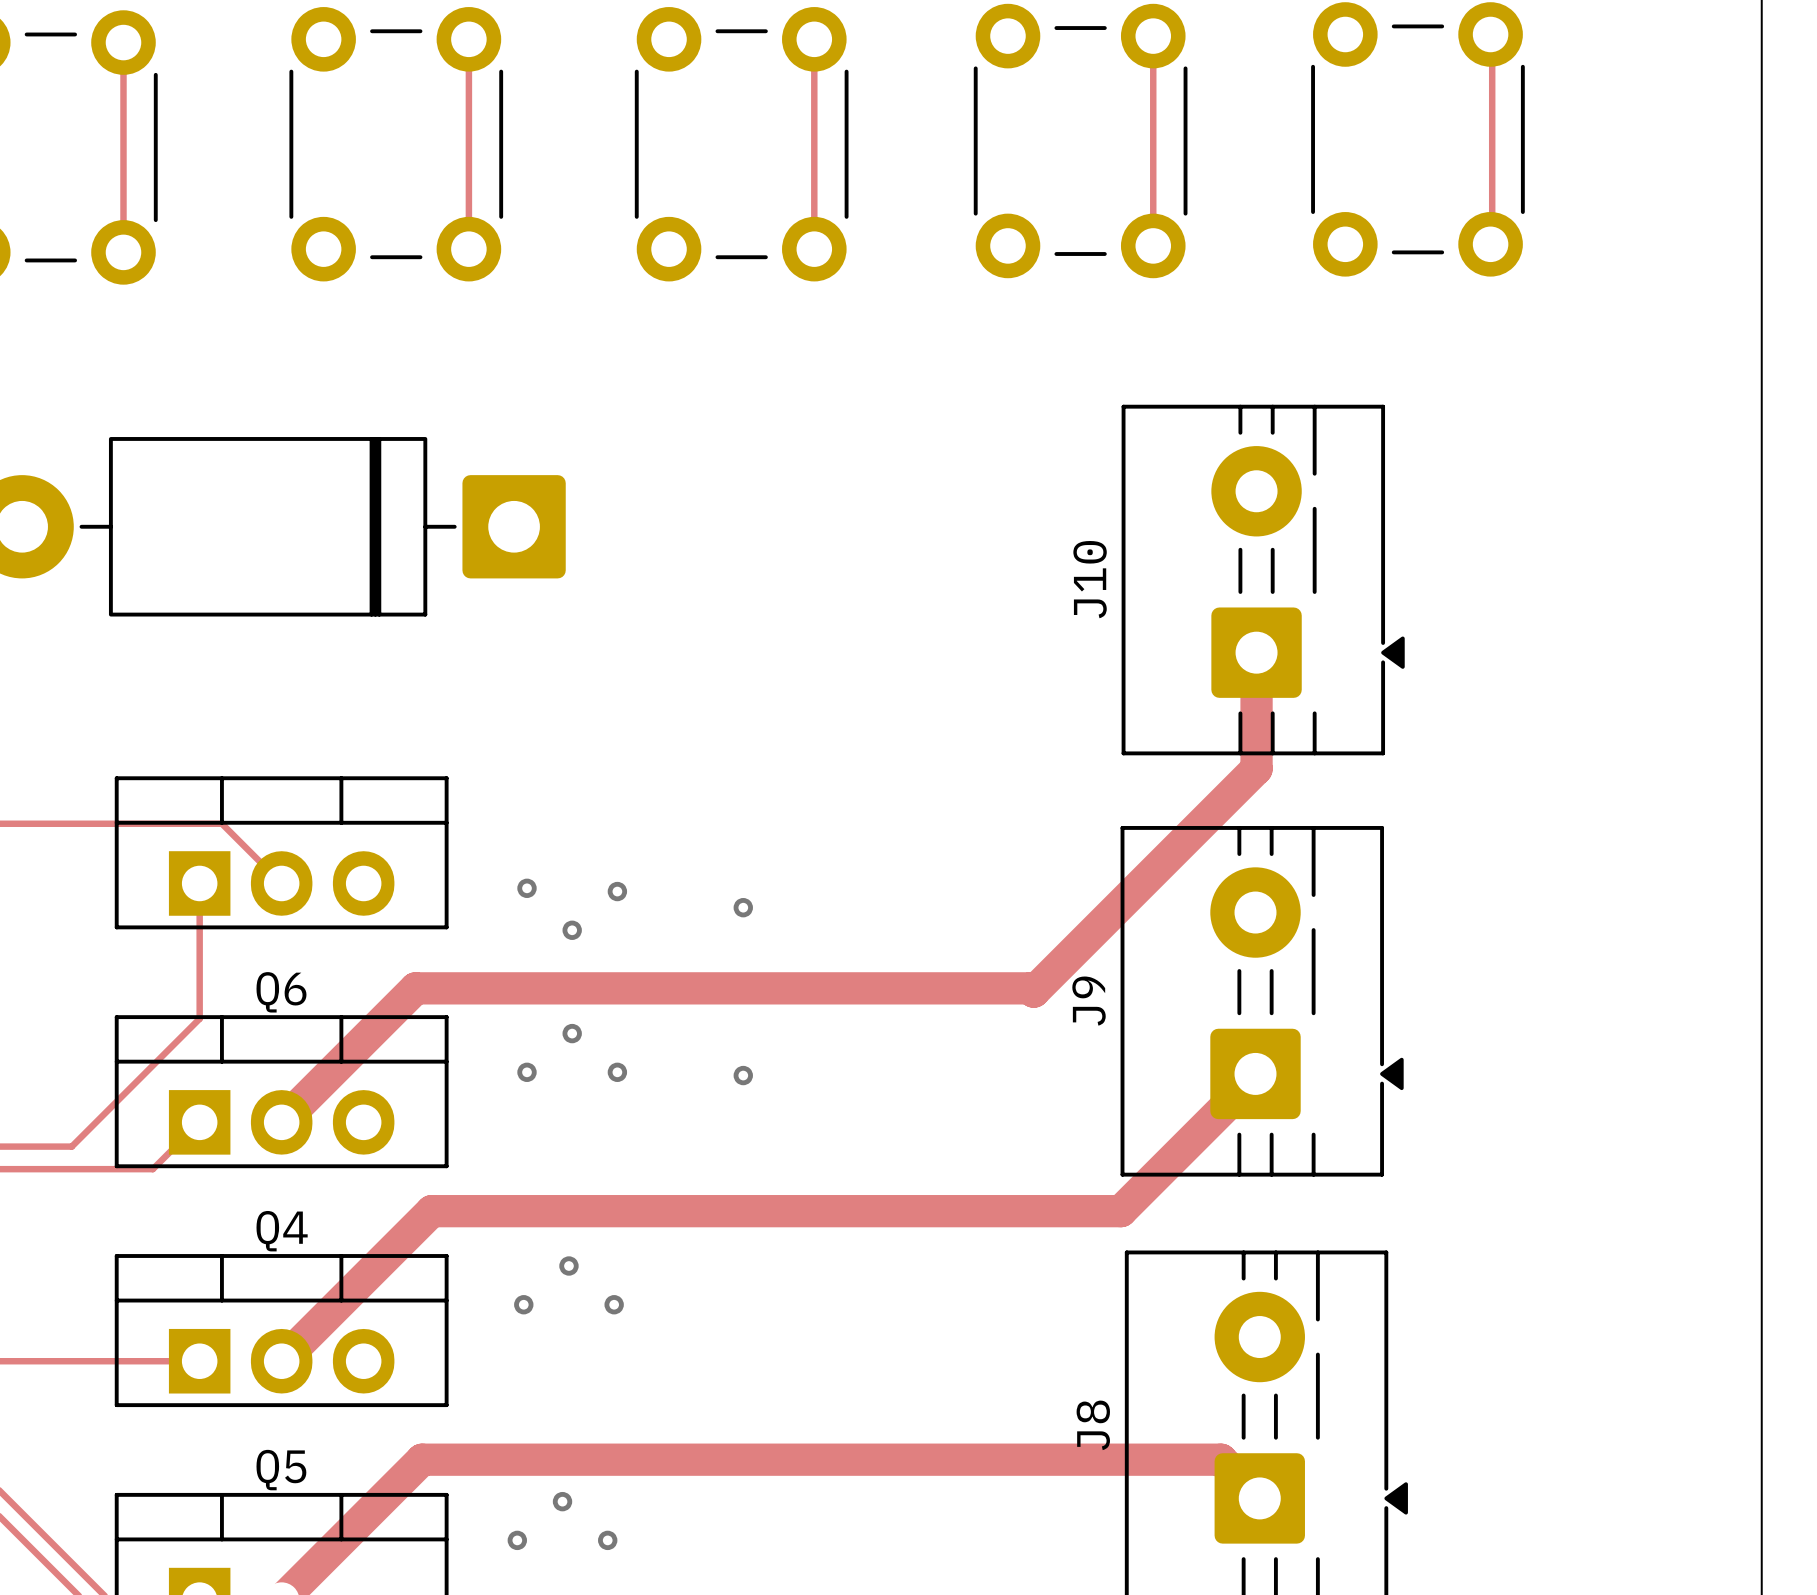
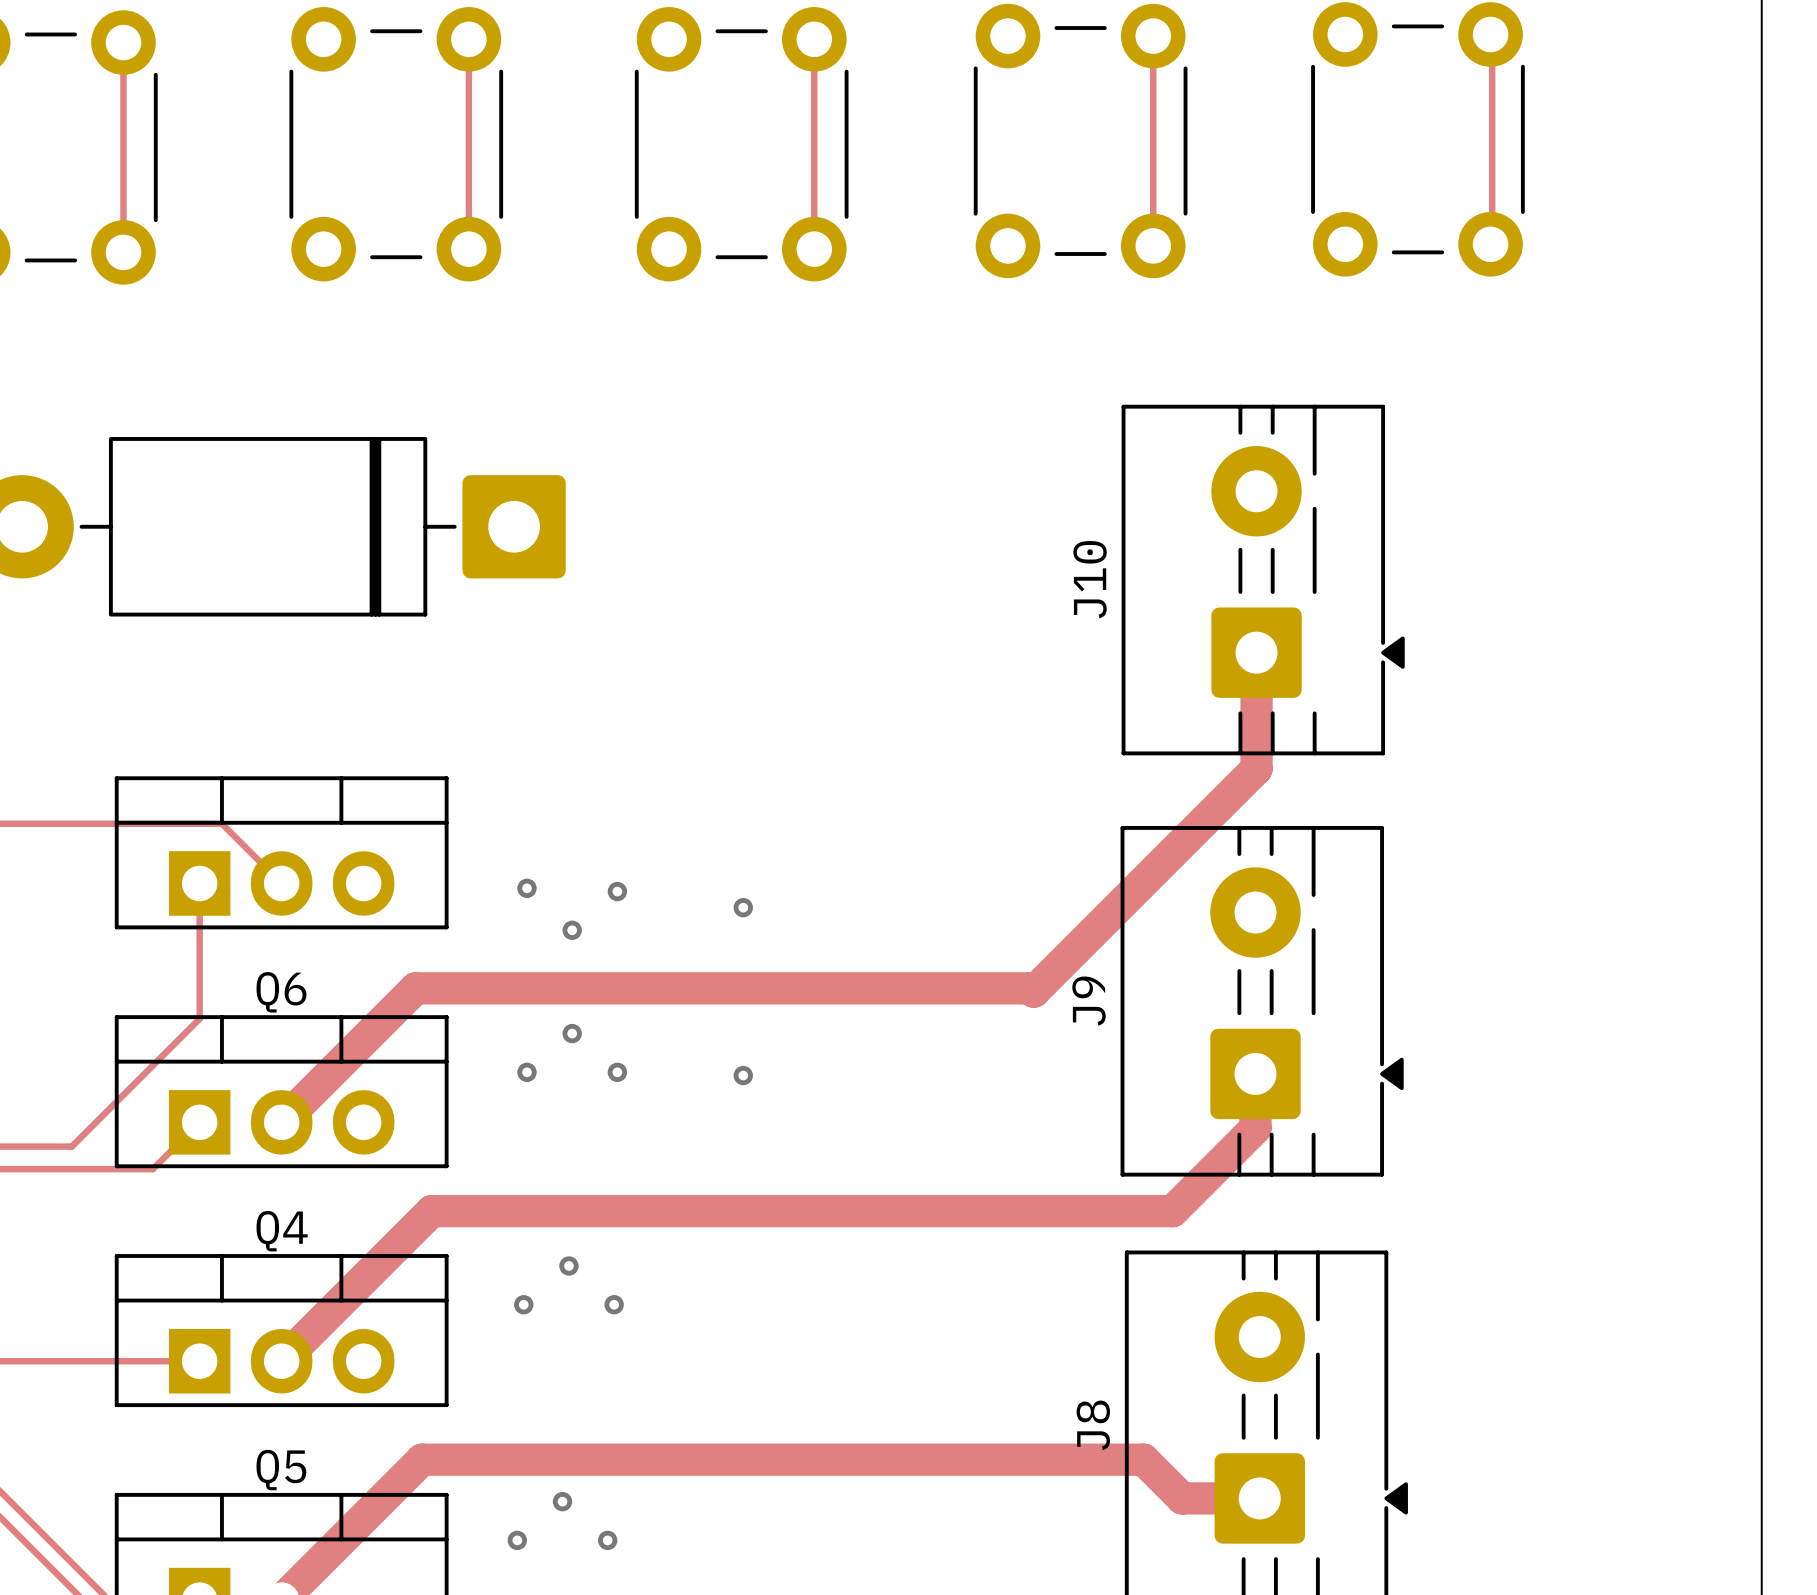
track: (1255, 1076) (1120, 1211) -> (1255, 1076) (1255, 1128) (1172, 1211) (1120, 1211)
track: (1143, 1459) (1221, 1459) (1259, 1498) -> (1143, 1459) (1182, 1498) (1259, 1498)

